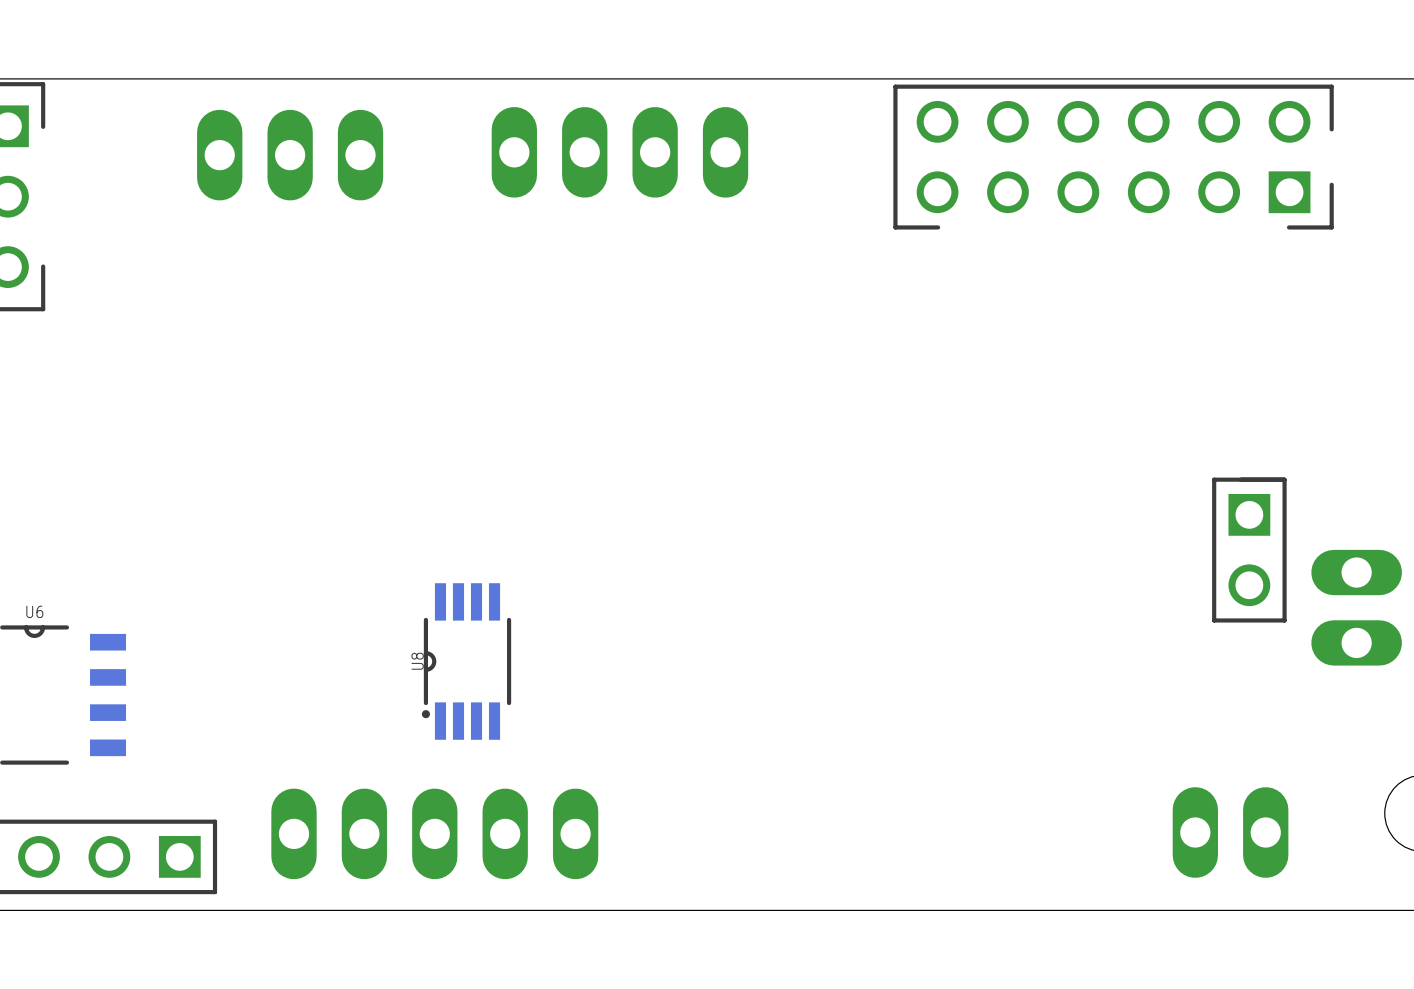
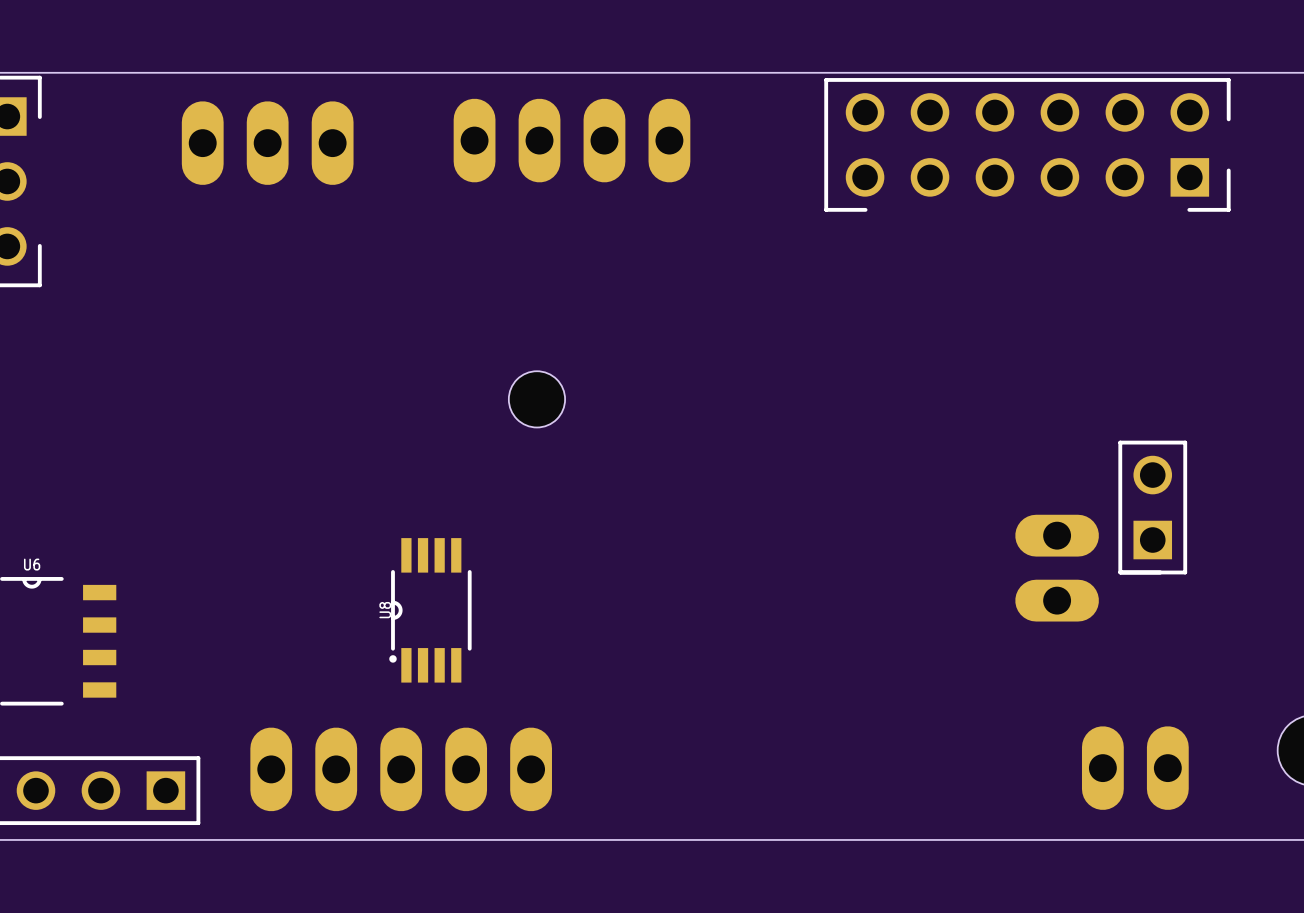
part: none -> (536, 399)
part rotation: 0° (1249, 550) -> 180° (1152, 507)
part position: (1356, 607) -> (1057, 568)

